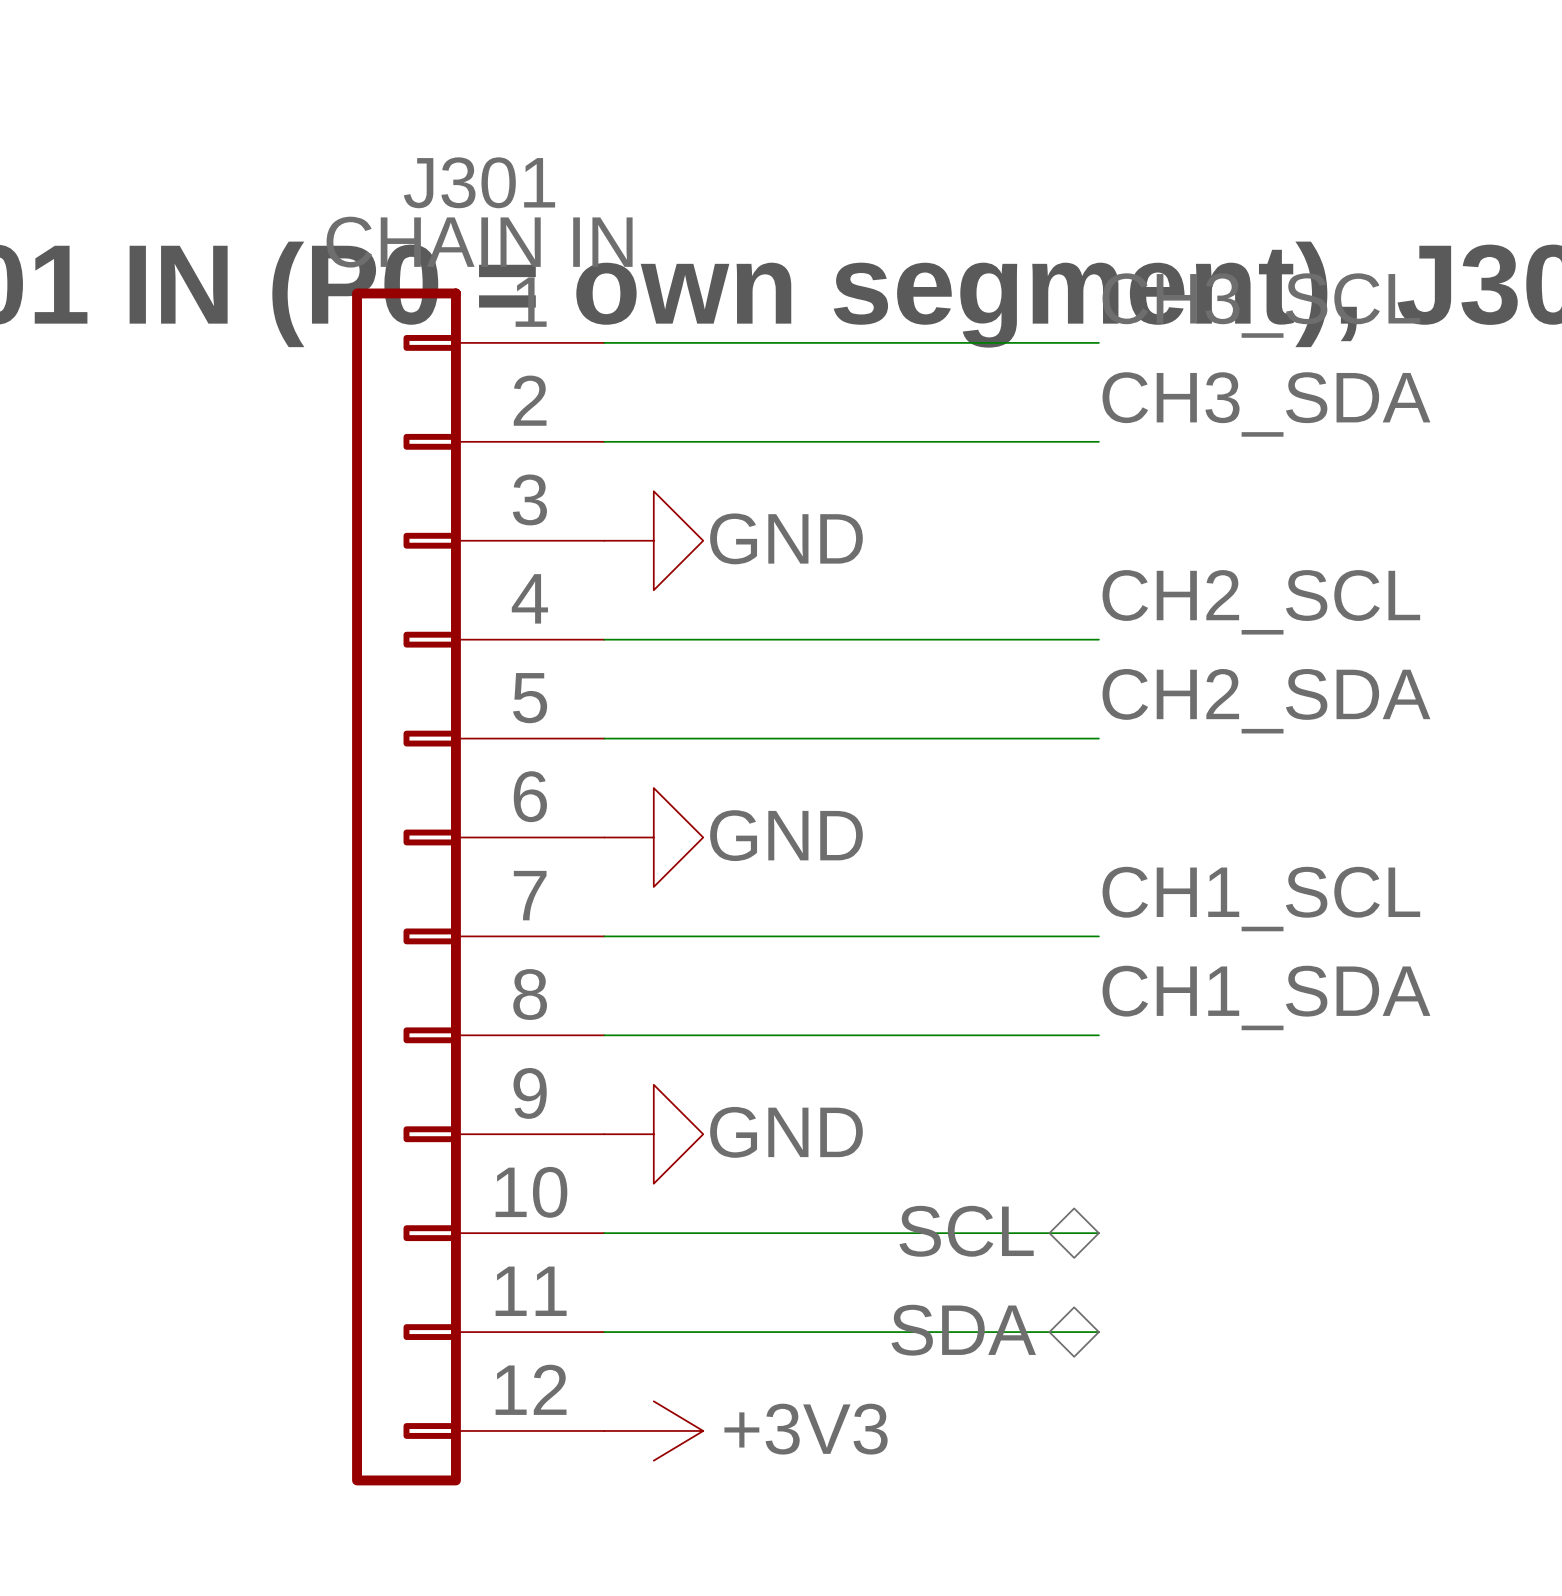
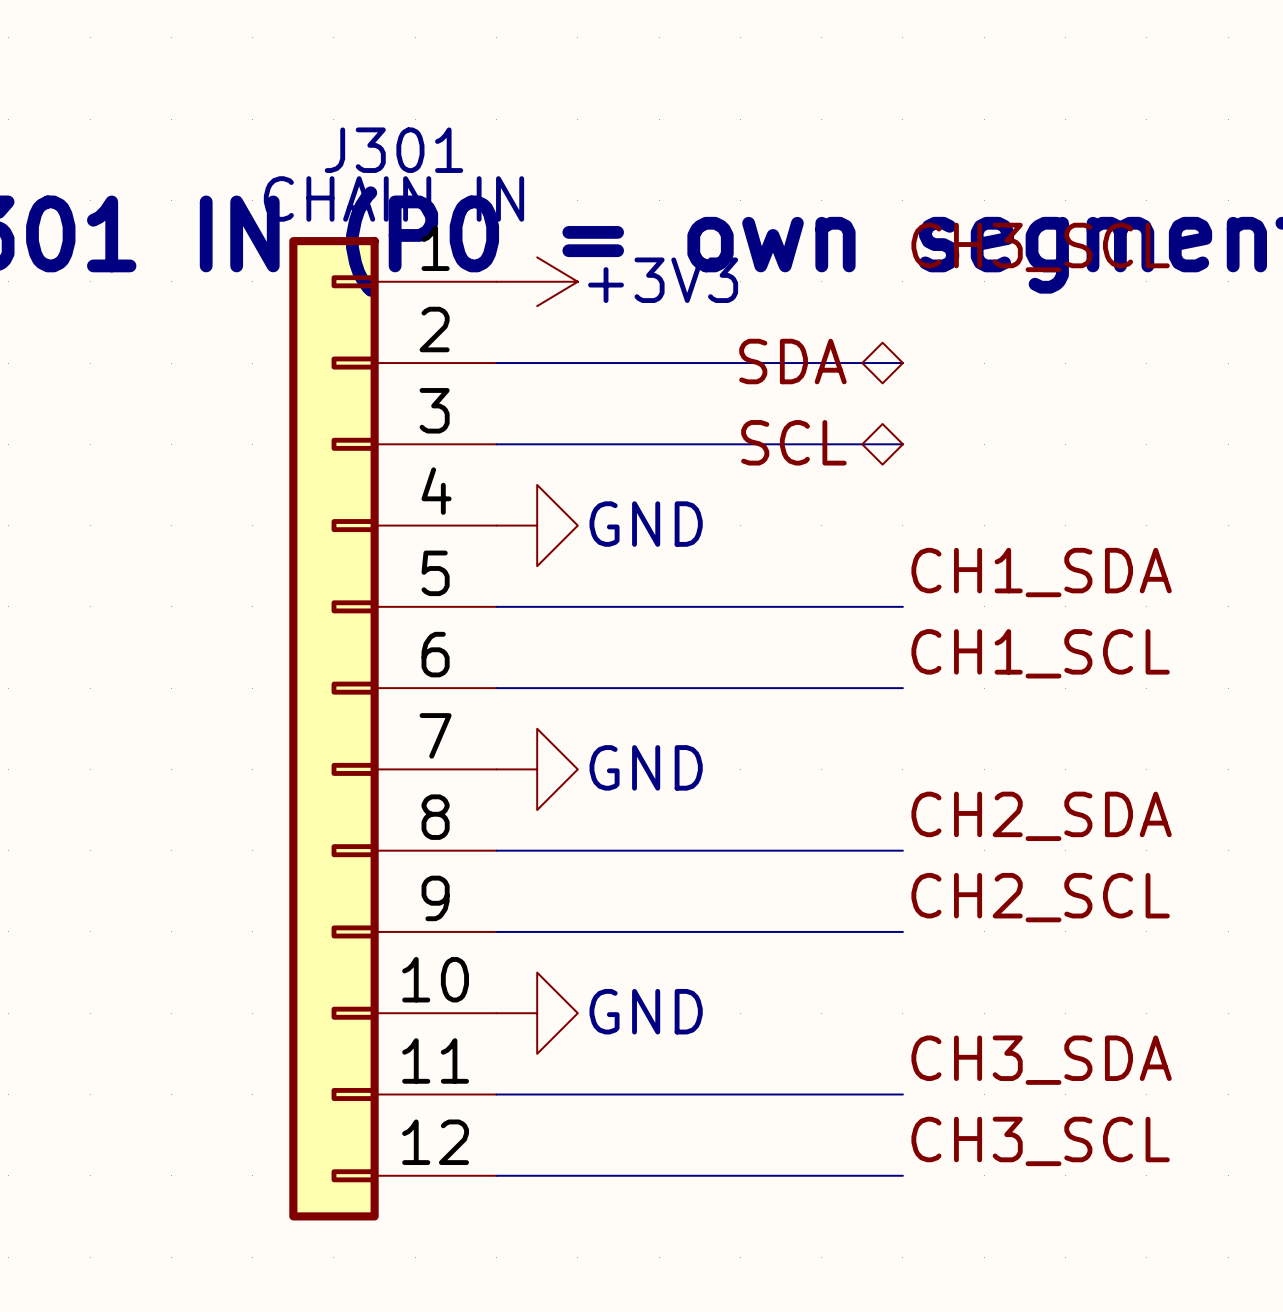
wire: (604, 342) (1098, 342) -> (496, 444) (902, 444)
power symbol: none -> +3V3 (537, 281)
label position: CH3_SDA (1266, 404) -> CH3_SDA (1041, 1060)
power symbol: GND (653, 540) -> none
label position: CH2_SCL (1261, 602) -> CH2_SCL (1040, 897)
wire: (604, 639) (1098, 639) -> (496, 688) (902, 688)
power symbol: none -> GND (537, 525)
label: CH2_SDA (1266, 701) -> CH1_SDA (1041, 572)
power symbol: GND (653, 837) -> none
label position: CH1_SCL (1261, 899) -> CH1_SCL (1040, 653)
wire: (604, 936) (1098, 936) -> (496, 931) (902, 931)
power symbol: none -> GND (537, 769)
label: CH1_SDA (1266, 997) -> CH2_SDA (1041, 816)
power symbol: GND (653, 1134) -> none
hierarchical label position: SCL (966, 1231) -> SCL (793, 442)
wire: (604, 1233) (1098, 1233) -> (496, 1175) (902, 1175)
power symbol: none -> GND (537, 1013)
hierarchical label position: SDA (963, 1330) -> SDA (792, 361)
label: none -> CH3_SCL (1040, 1141)
power symbol: +3V3 (653, 1430) -> none

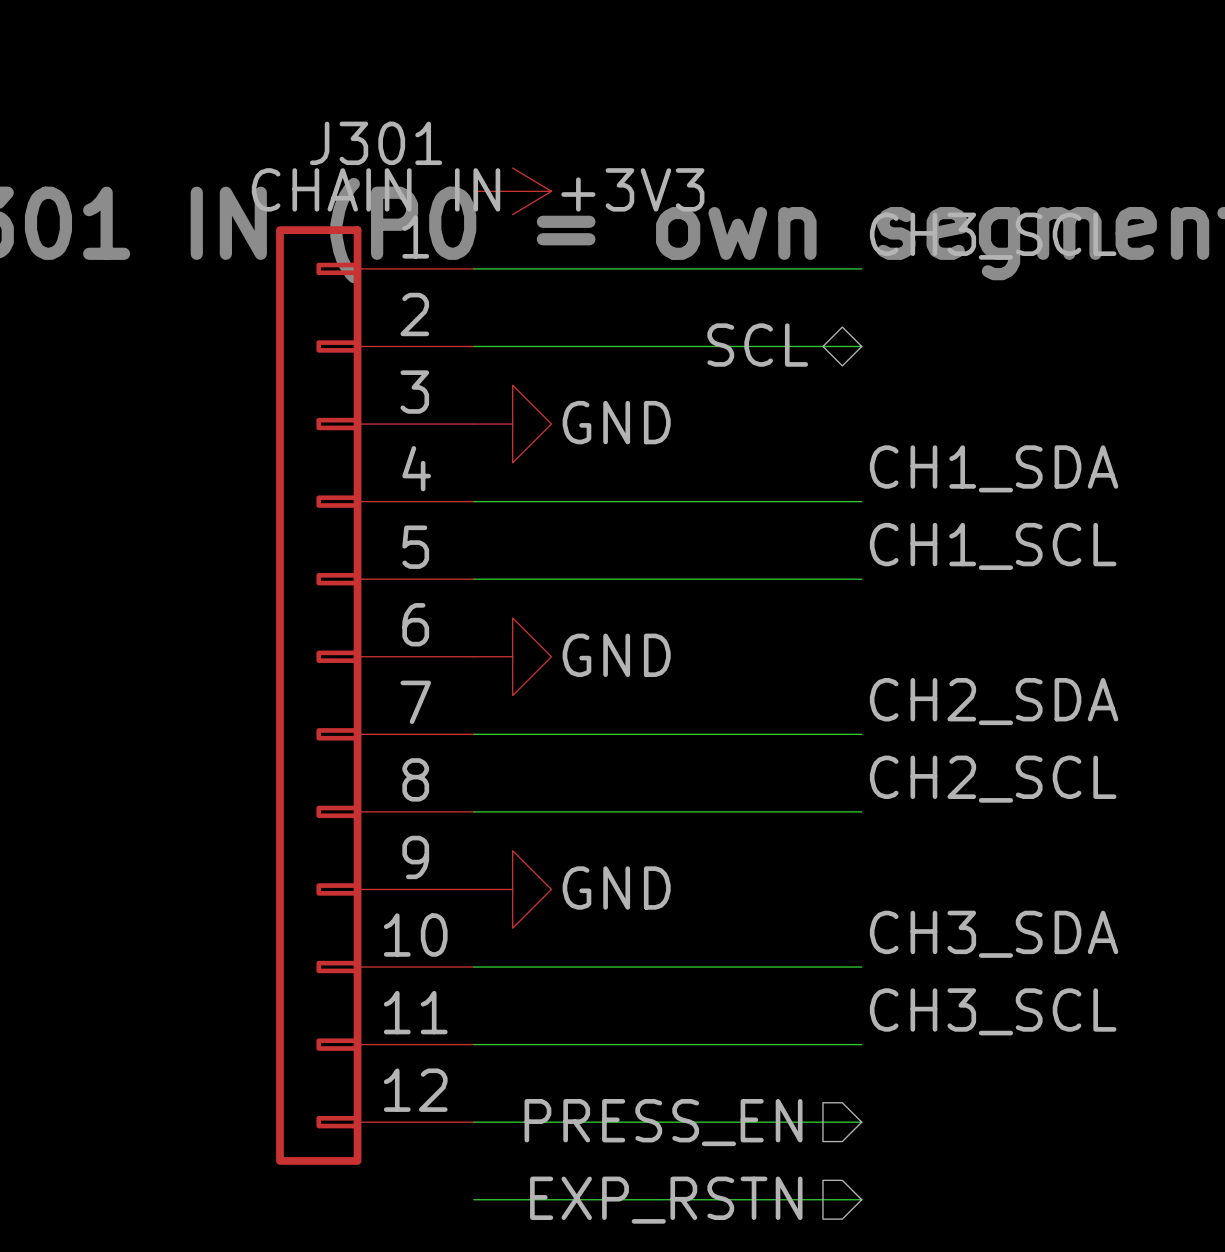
wire: none -> (473, 268) (861, 268)
power symbol position: +3V3 (537, 281) -> +3V3 (512, 191)
hierarchical label: SDA (792, 361) -> SCL (757, 345)
hierarchical label: SCL (793, 442) -> none
wire: (496, 444) (902, 444) -> (473, 501) (861, 501)
power symbol: none -> GND (512, 424)
label: none -> CH1_SDA (994, 468)
power symbol: GND (537, 525) -> none
label: CH1_SDA (1041, 572) -> CH1_SCL (993, 546)
label: CH1_SCL (1040, 653) -> none
wire: (496, 688) (902, 688) -> (473, 734) (861, 734)
power symbol: none -> GND (512, 656)
label: none -> CH2_SDA (994, 701)
power symbol: GND (537, 769) -> none
label: CH2_SDA (1041, 816) -> CH2_SCL (993, 779)
label: CH2_SCL (1040, 897) -> none
wire: (496, 931) (902, 931) -> (473, 967) (861, 967)
power symbol: none -> GND (512, 889)
label: none -> CH3_SDA (994, 934)
power symbol: GND (537, 1013) -> none
label: CH3_SDA (1041, 1060) -> CH3_SCL (993, 1011)
label: CH3_SCL (1040, 1141) -> none
hierarchical label: none -> PRESS_EN (663, 1122)
wire: none -> (473, 1199) (861, 1199)
hierarchical label: none -> EXP_RSTN (666, 1200)

